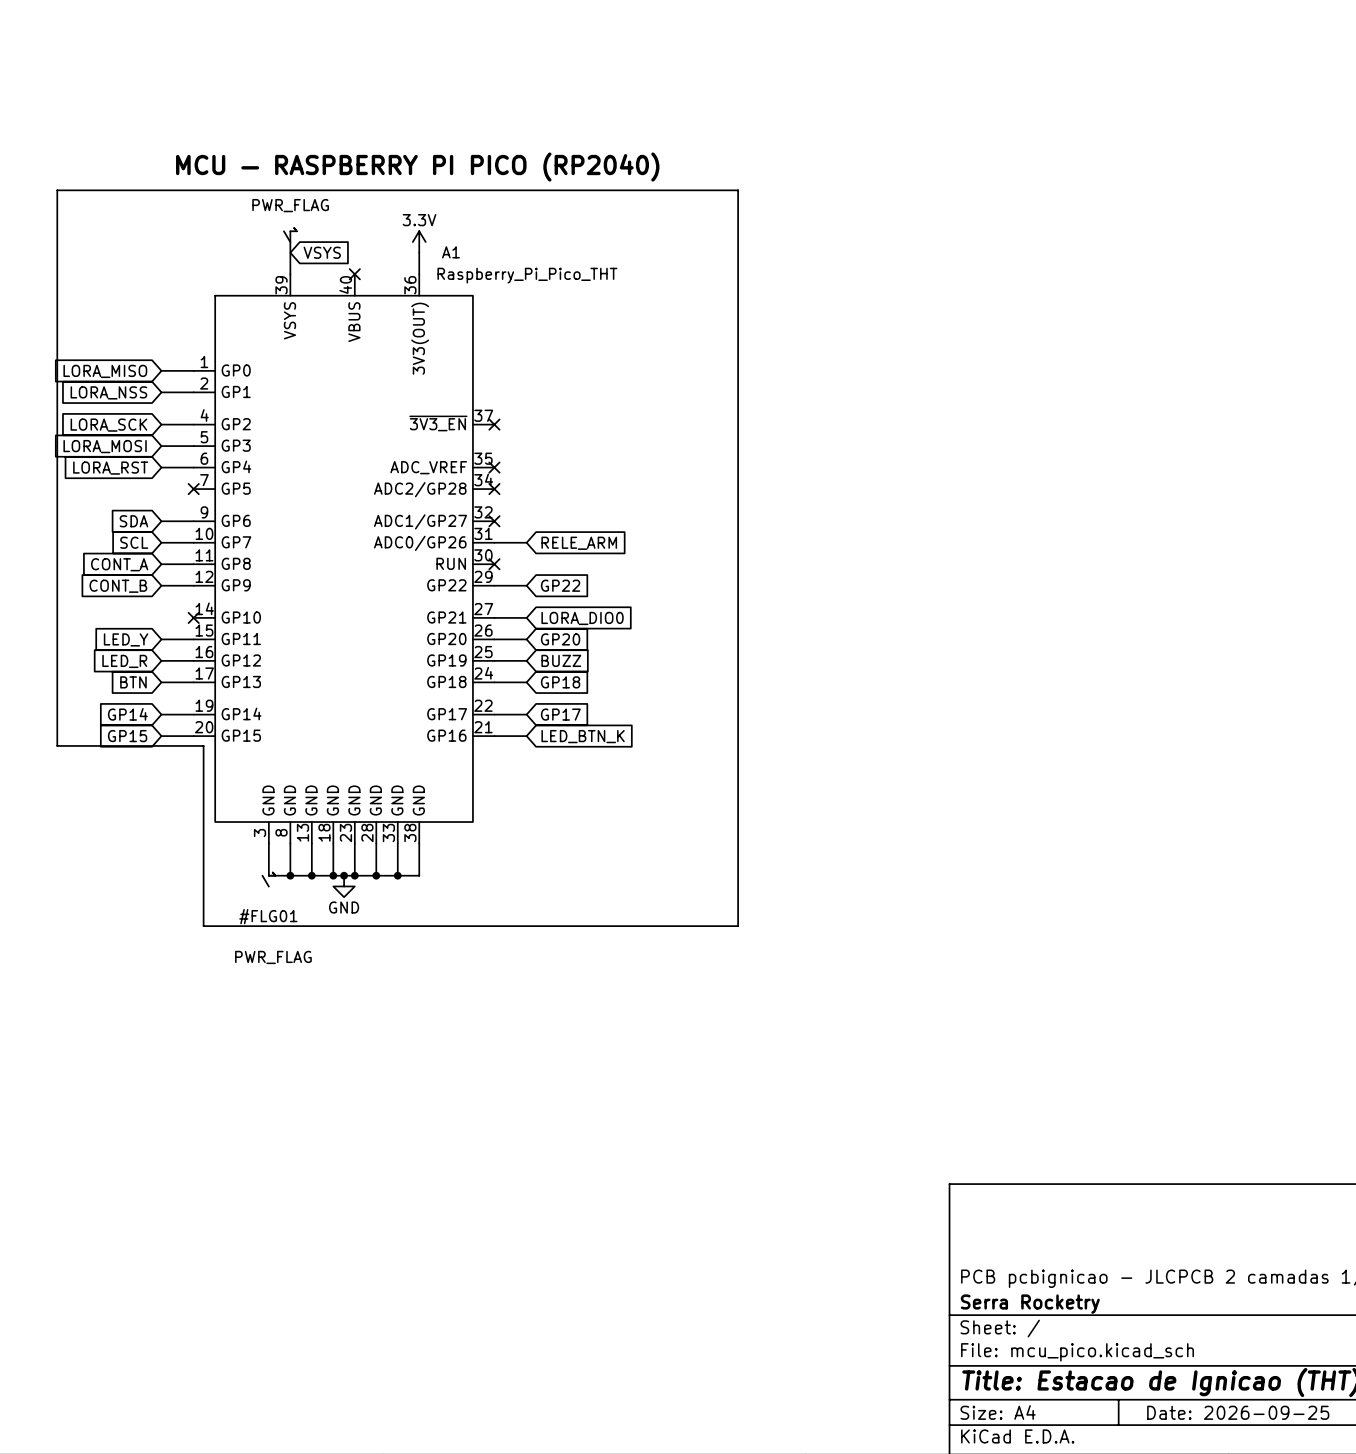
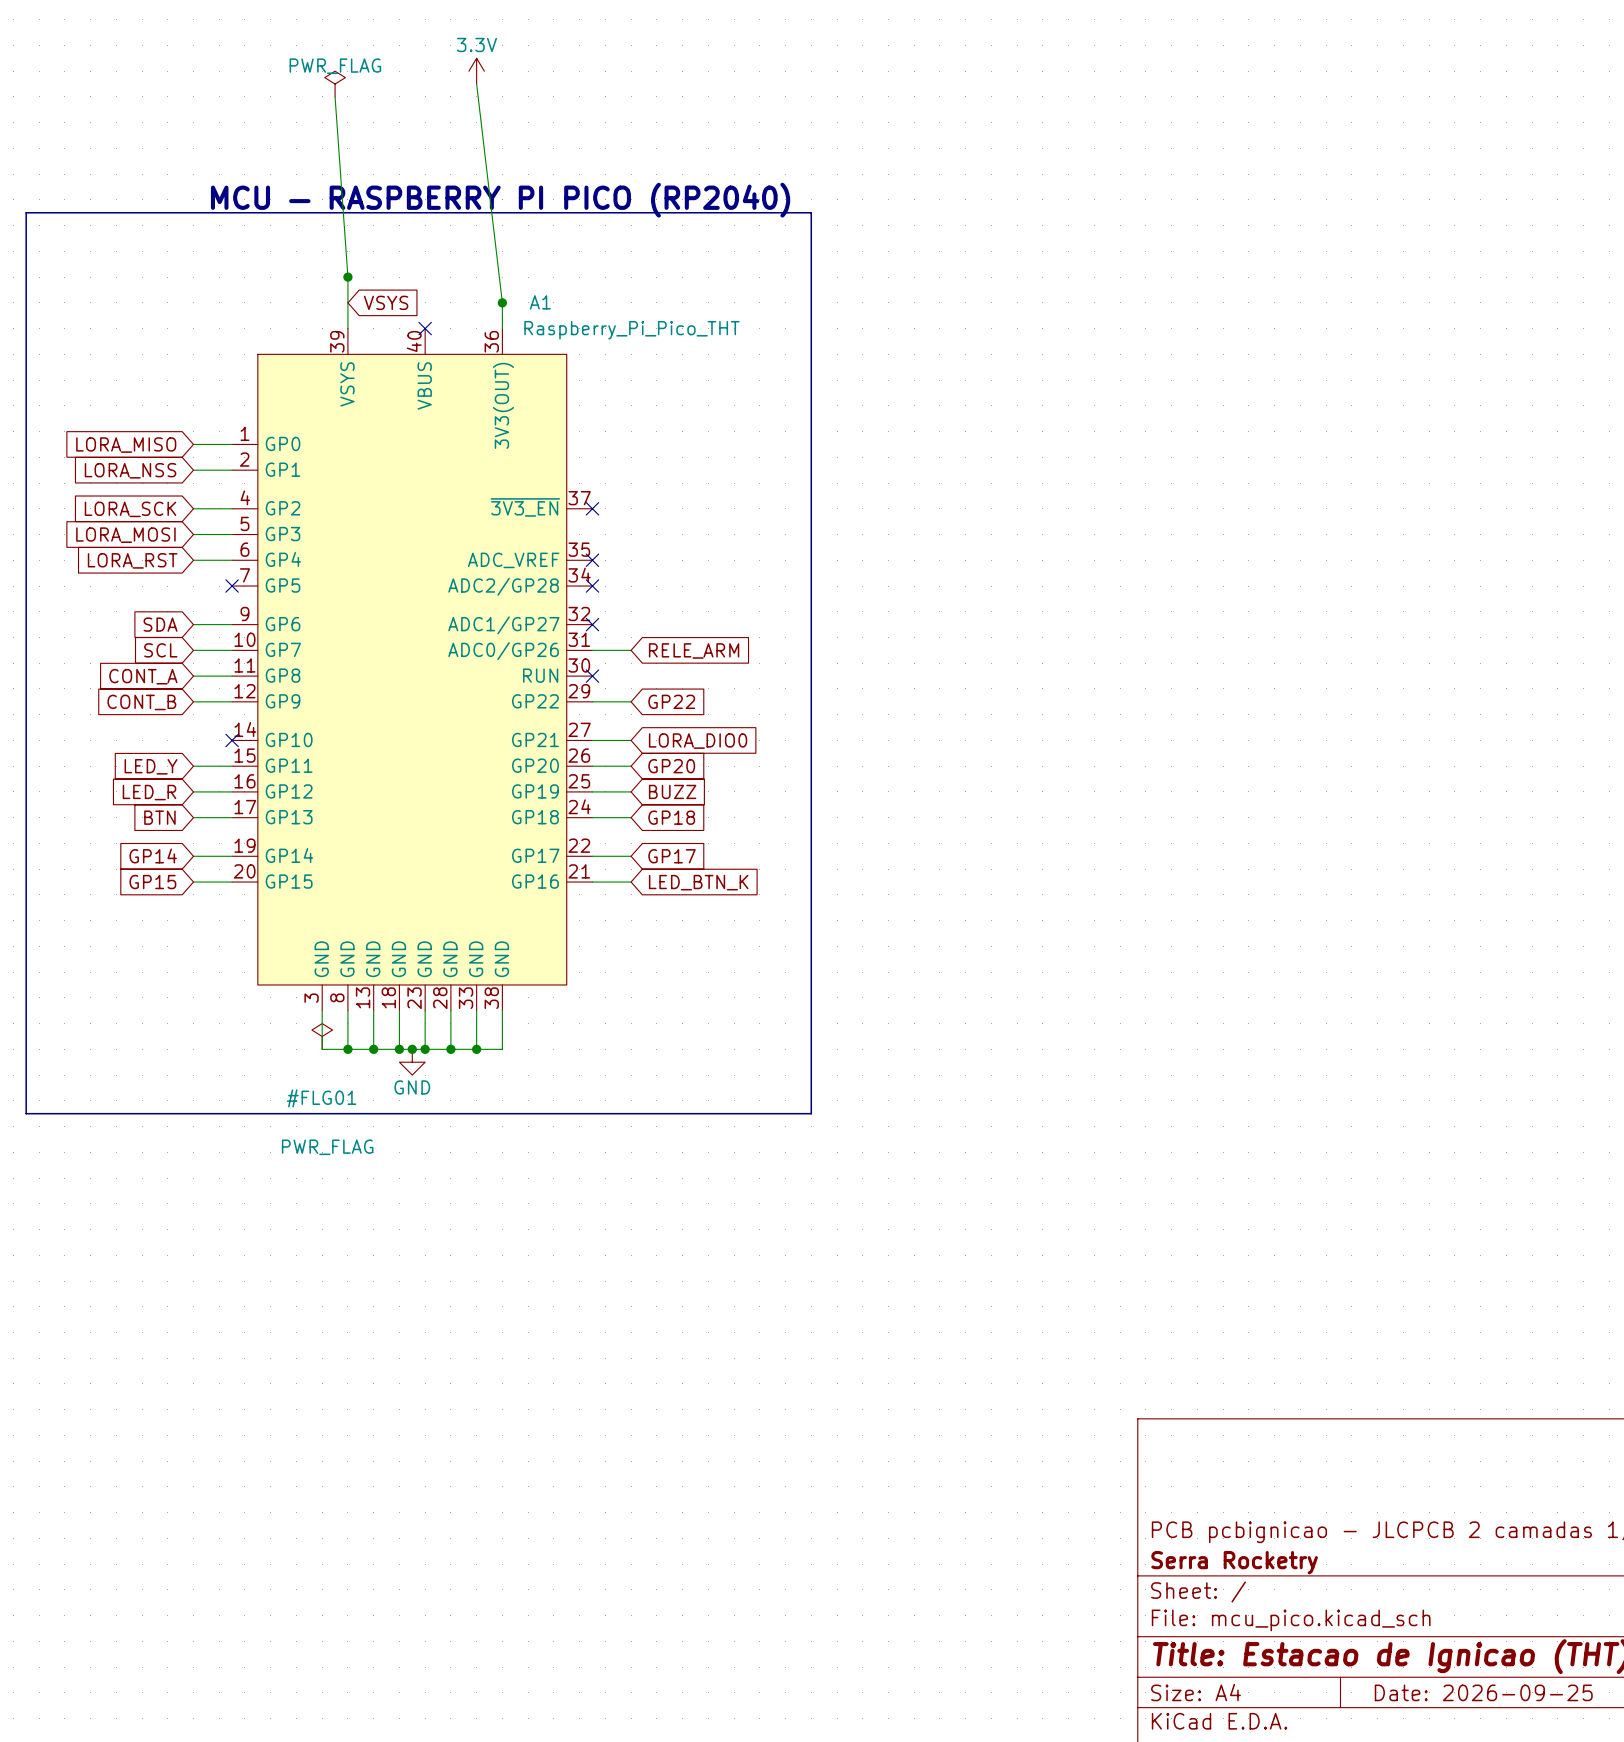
power symbol: none -> PWR_FLAG (335, 84)
wire: none -> (476, 84) (502, 302)
wire: none -> (335, 96) (347, 277)
line: (57, 190) (738, 190) (738, 926) (203, 926) (203, 745) (57, 745) (57, 190) -> (26, 212) (26, 1113) (811, 1113) (811, 212) (26, 212)
junction: none -> (347, 277)
power symbol: PWR_FLAG (290, 234) -> none
power symbol position: 3.3V (419, 242) -> 3.3V (476, 71)
junction: none -> (502, 302)
#FLG01 shape: [262, 872, 276, 887] -> [311, 1023, 333, 1050]

